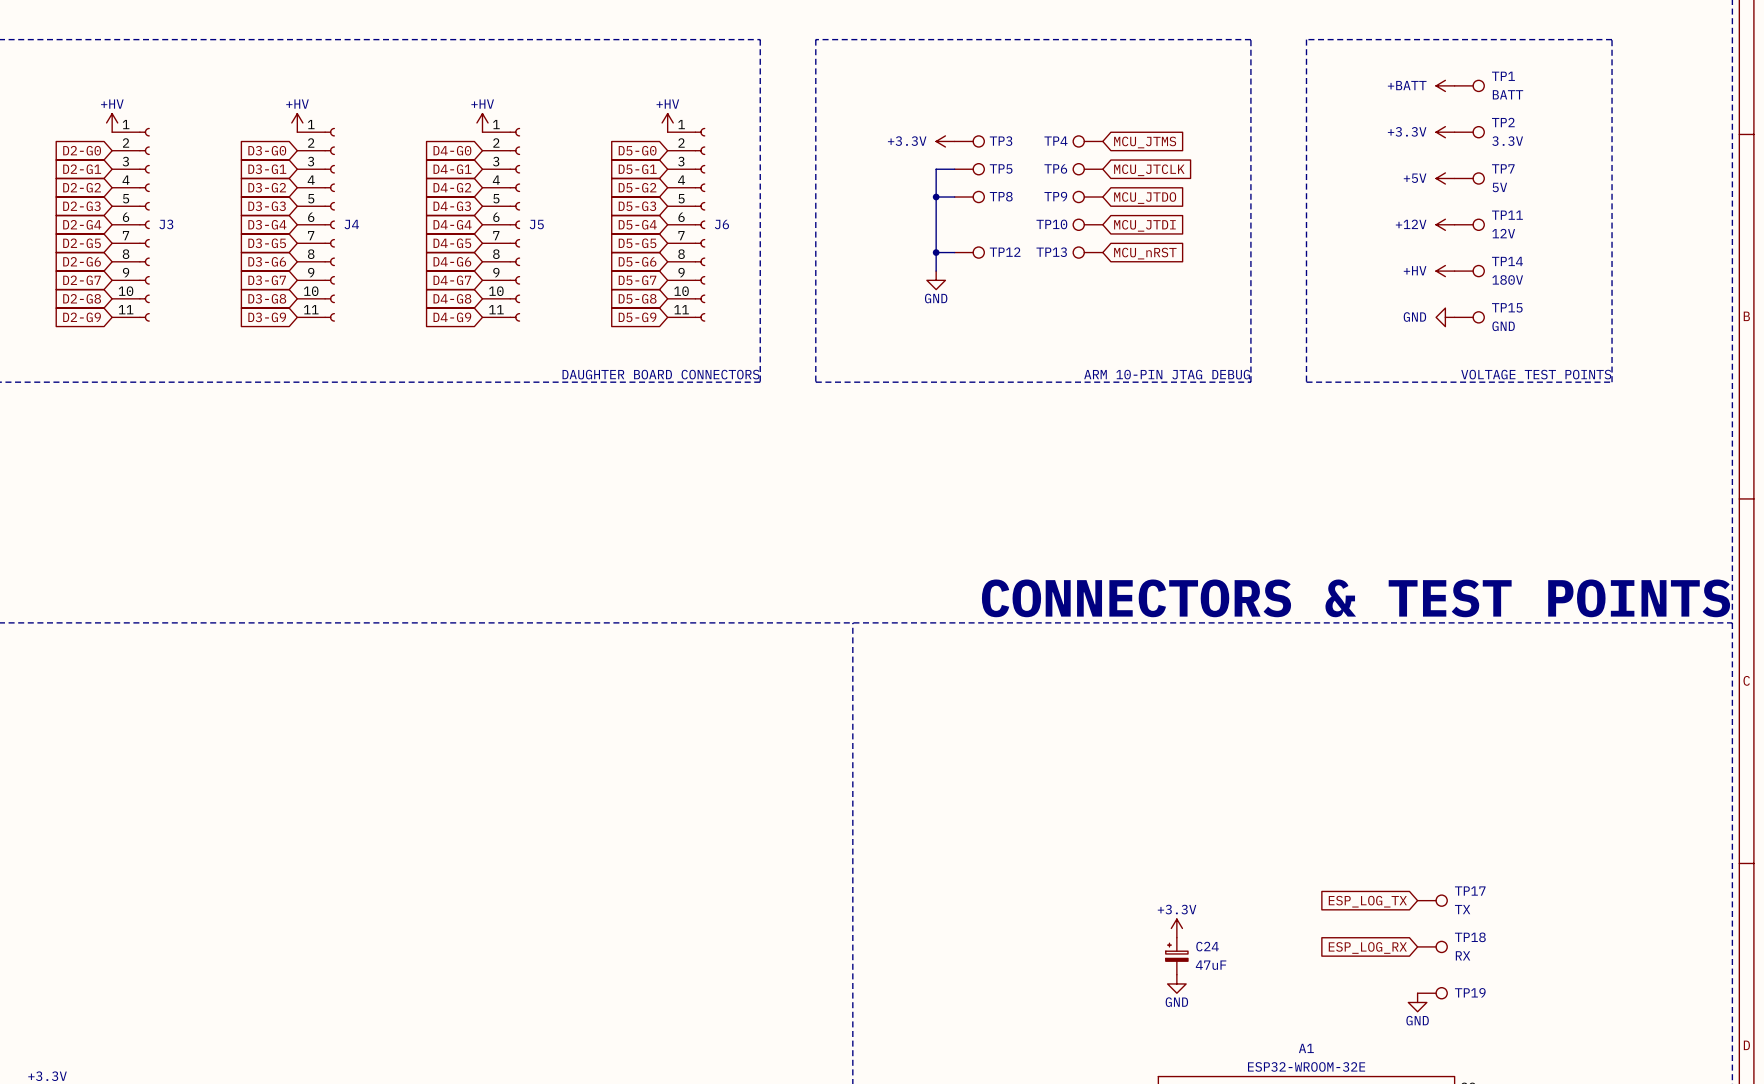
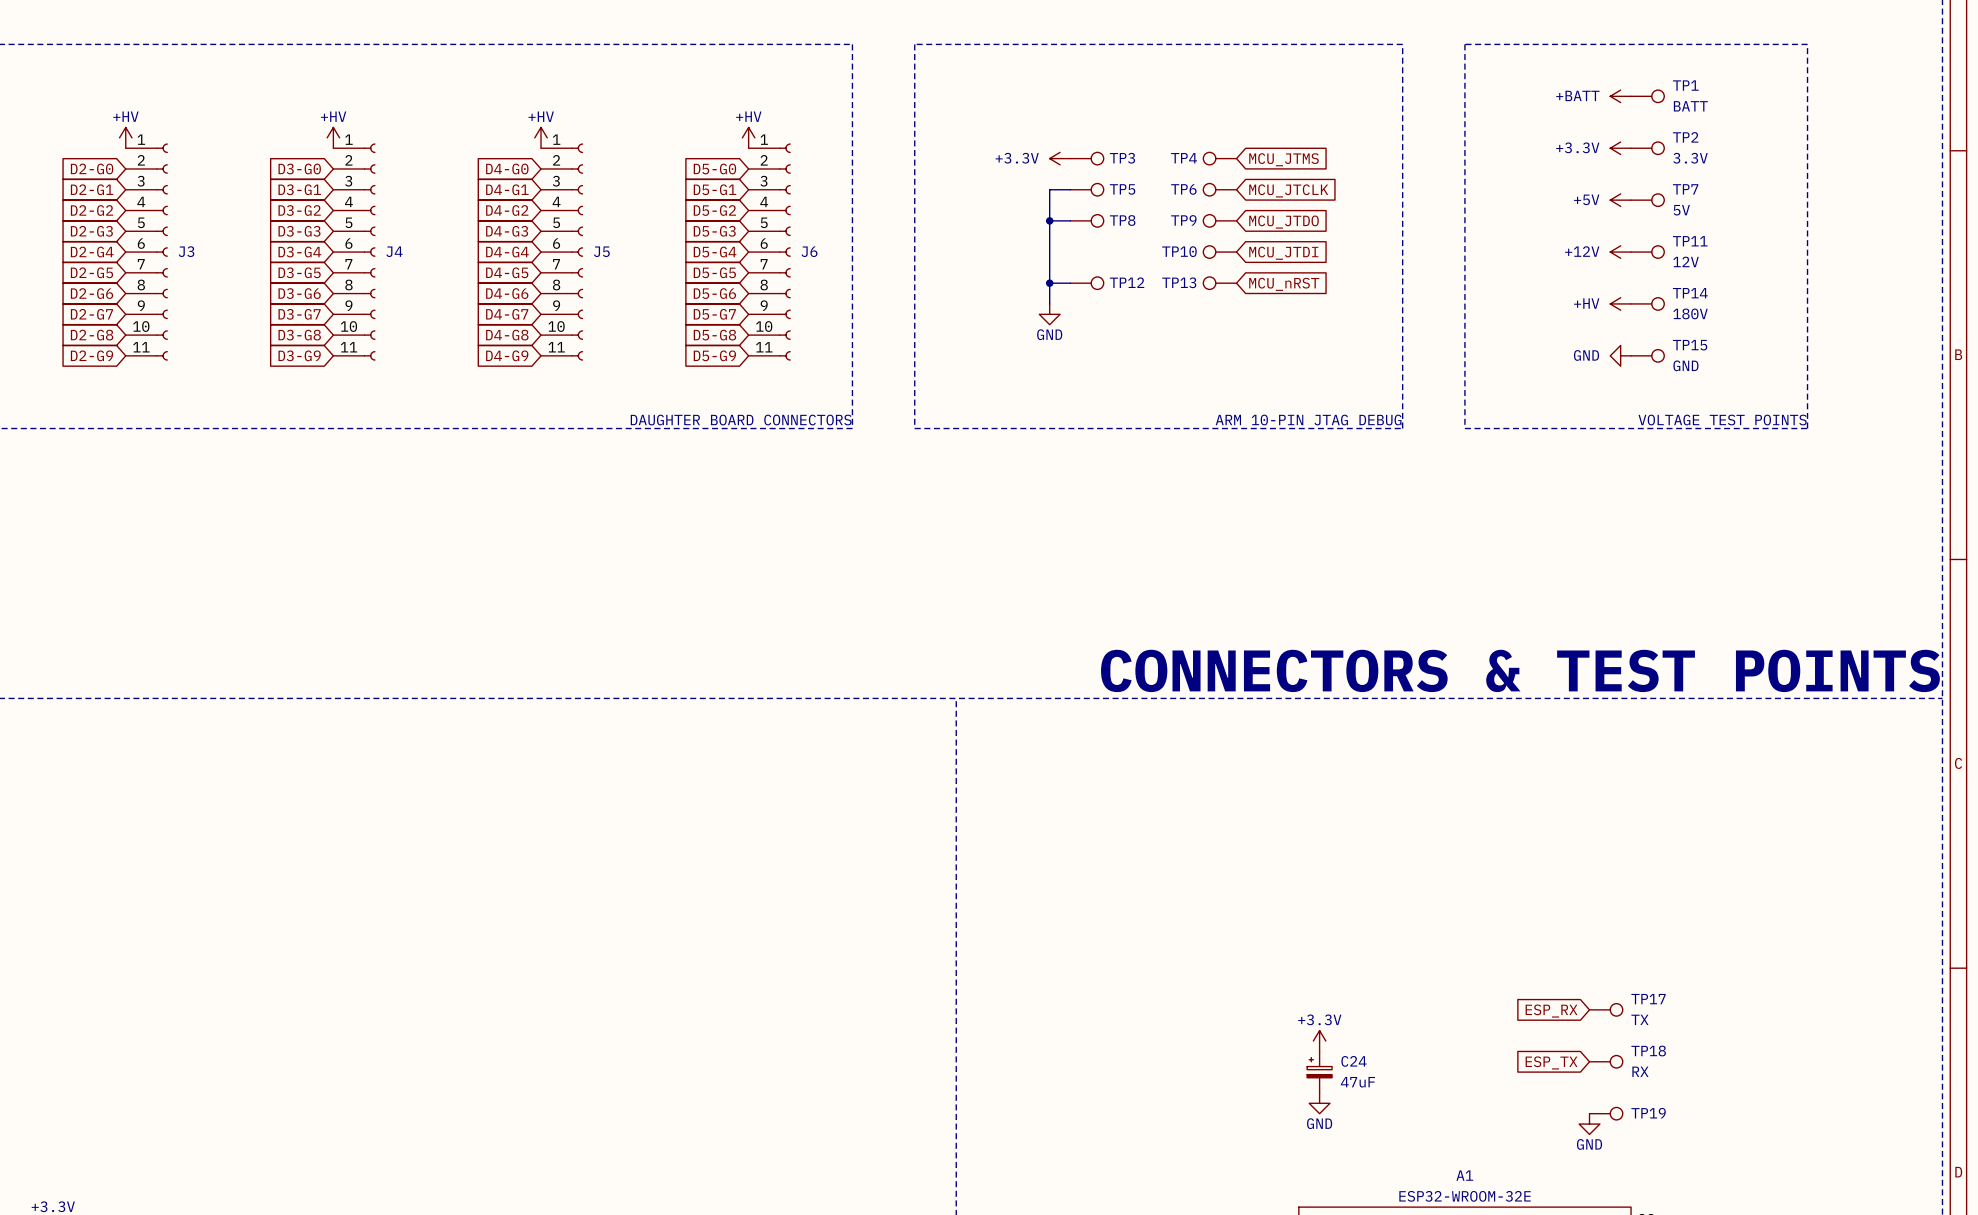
global label: ESP_LOG_TX (1367, 901) -> ESP_RX (1551, 1011)
global label: ESP_LOG_RX (1367, 947) -> ESP_TX (1551, 1062)

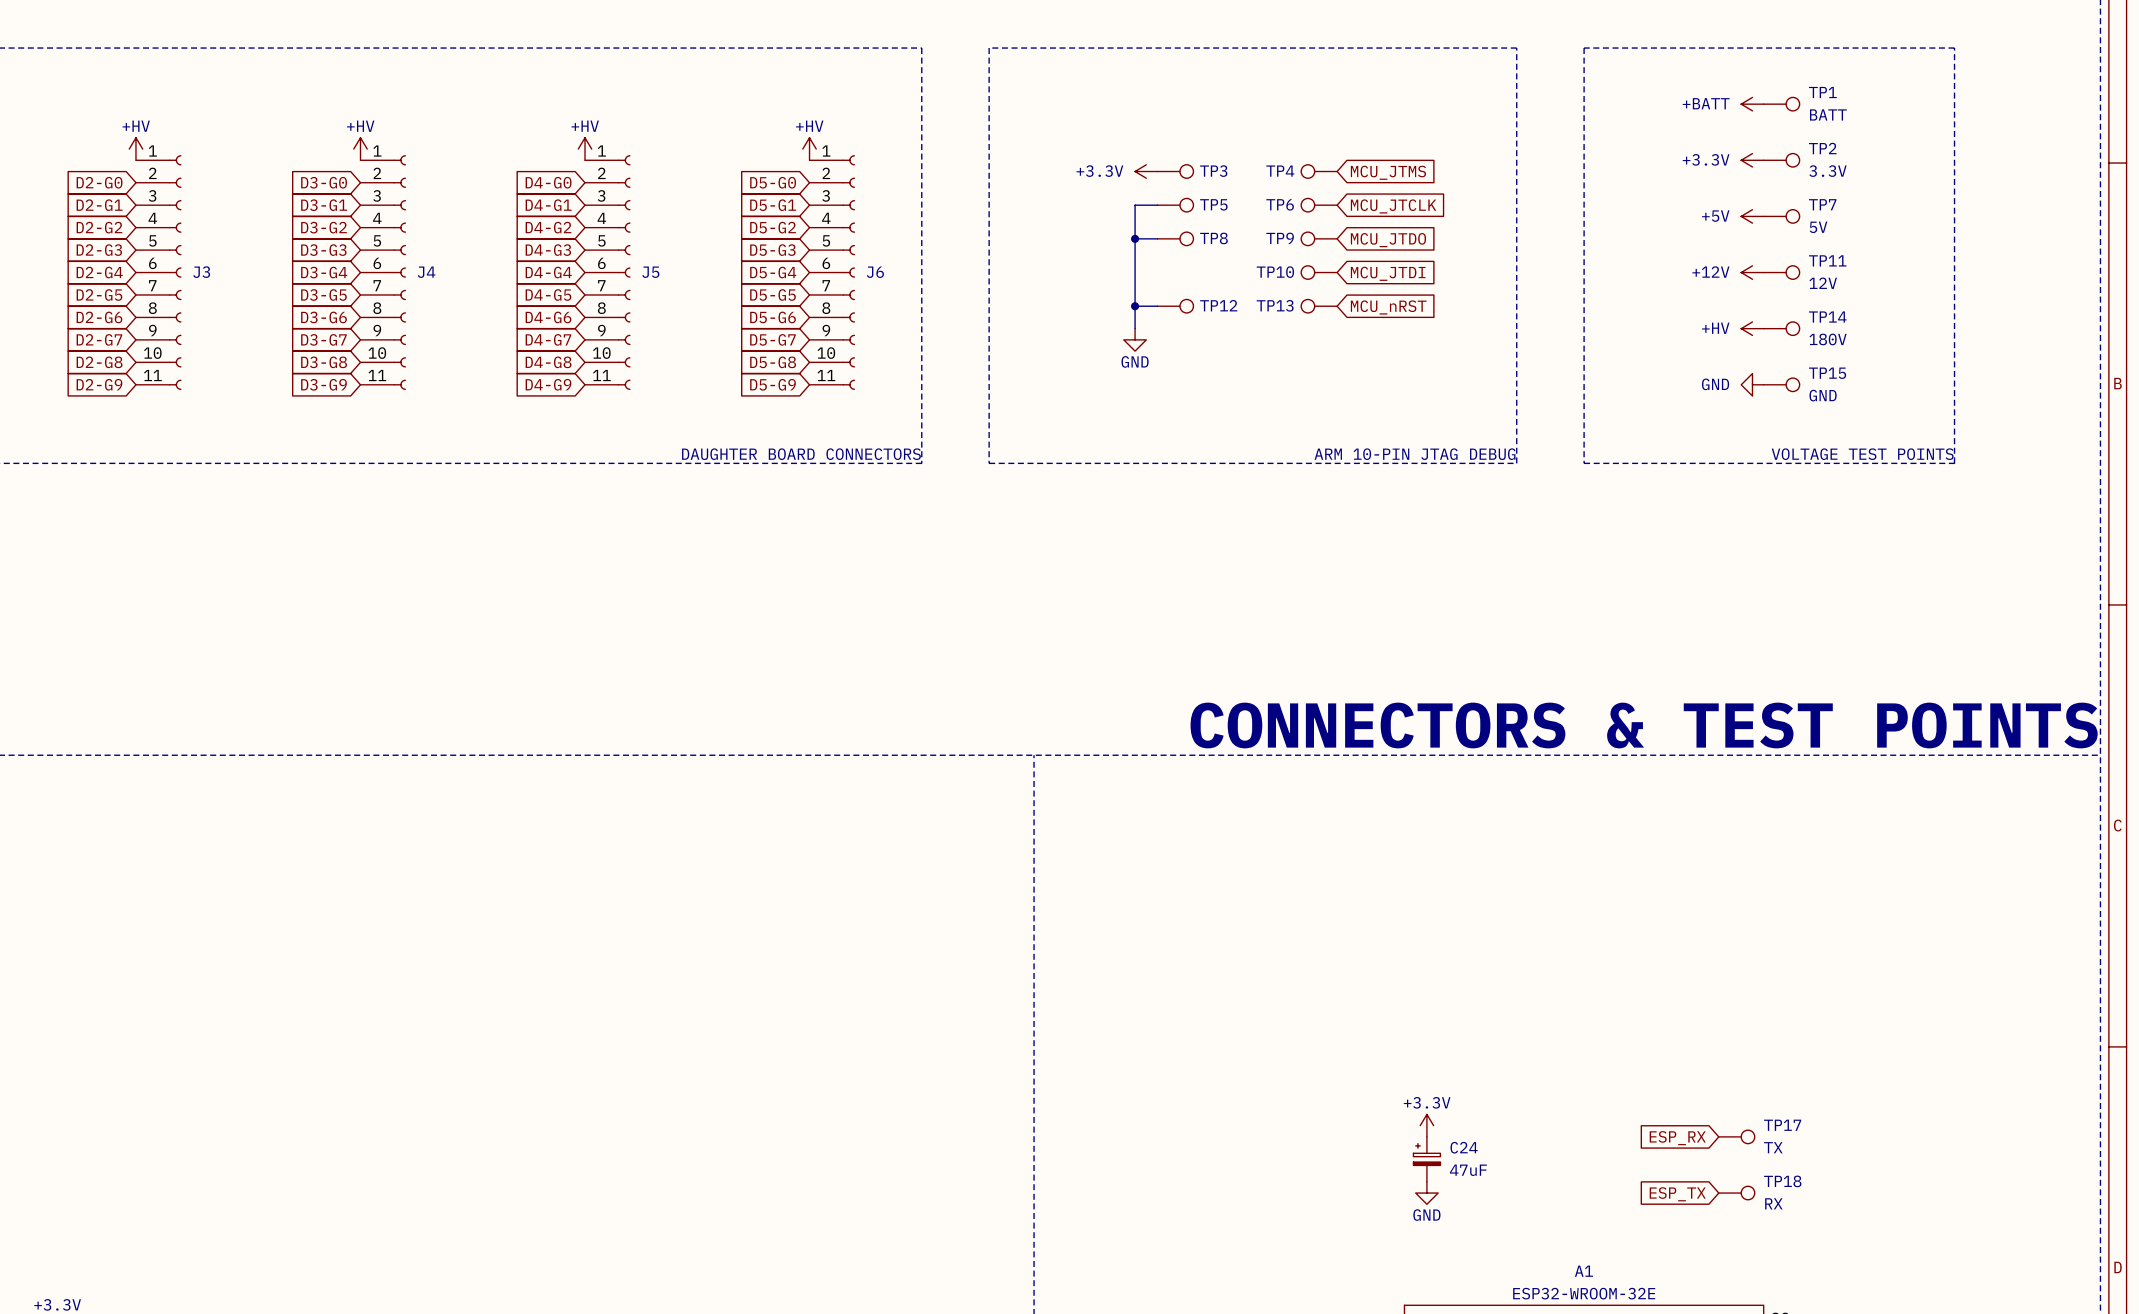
TP17 position: (1606, 1009) -> (1736, 1136)
global label position: ESP_RX (1551, 1011) -> ESP_RX (1677, 1138)
TP18 position: (1606, 1061) -> (1736, 1193)
global label position: ESP_TX (1551, 1062) -> ESP_TX (1677, 1194)
TP19: (1606, 1113) -> none
power symbol: GND (1589, 1124) -> none

